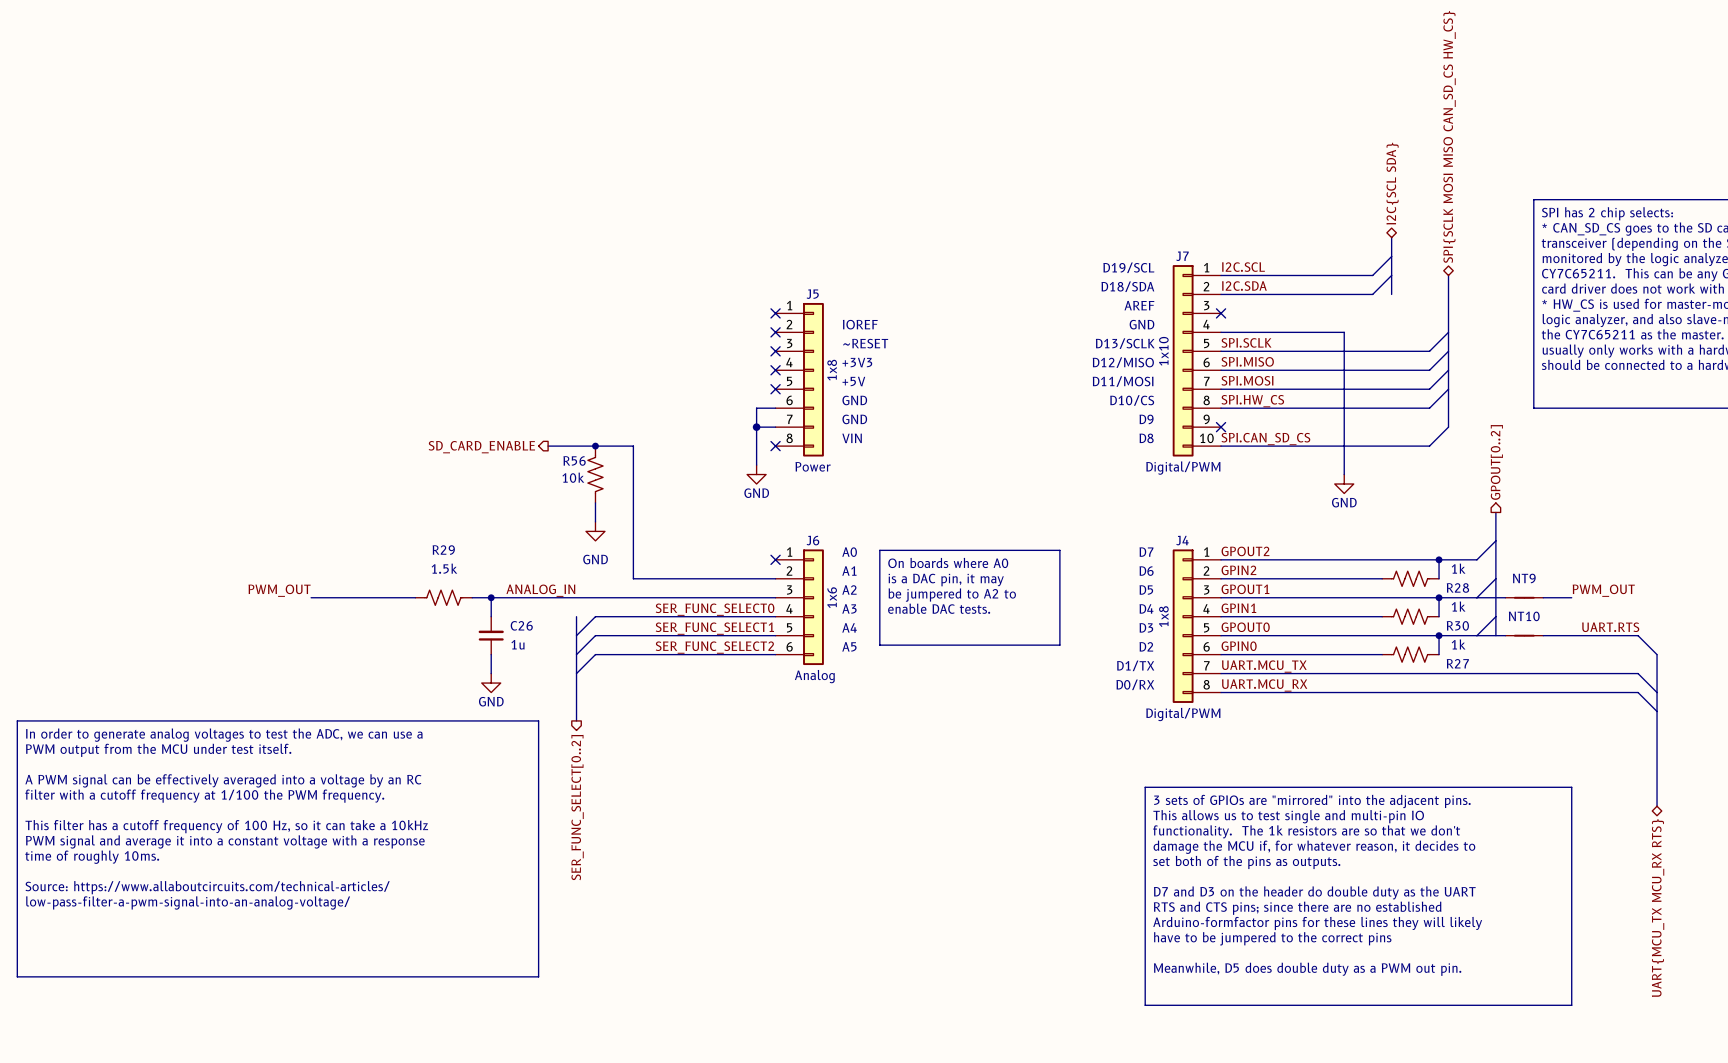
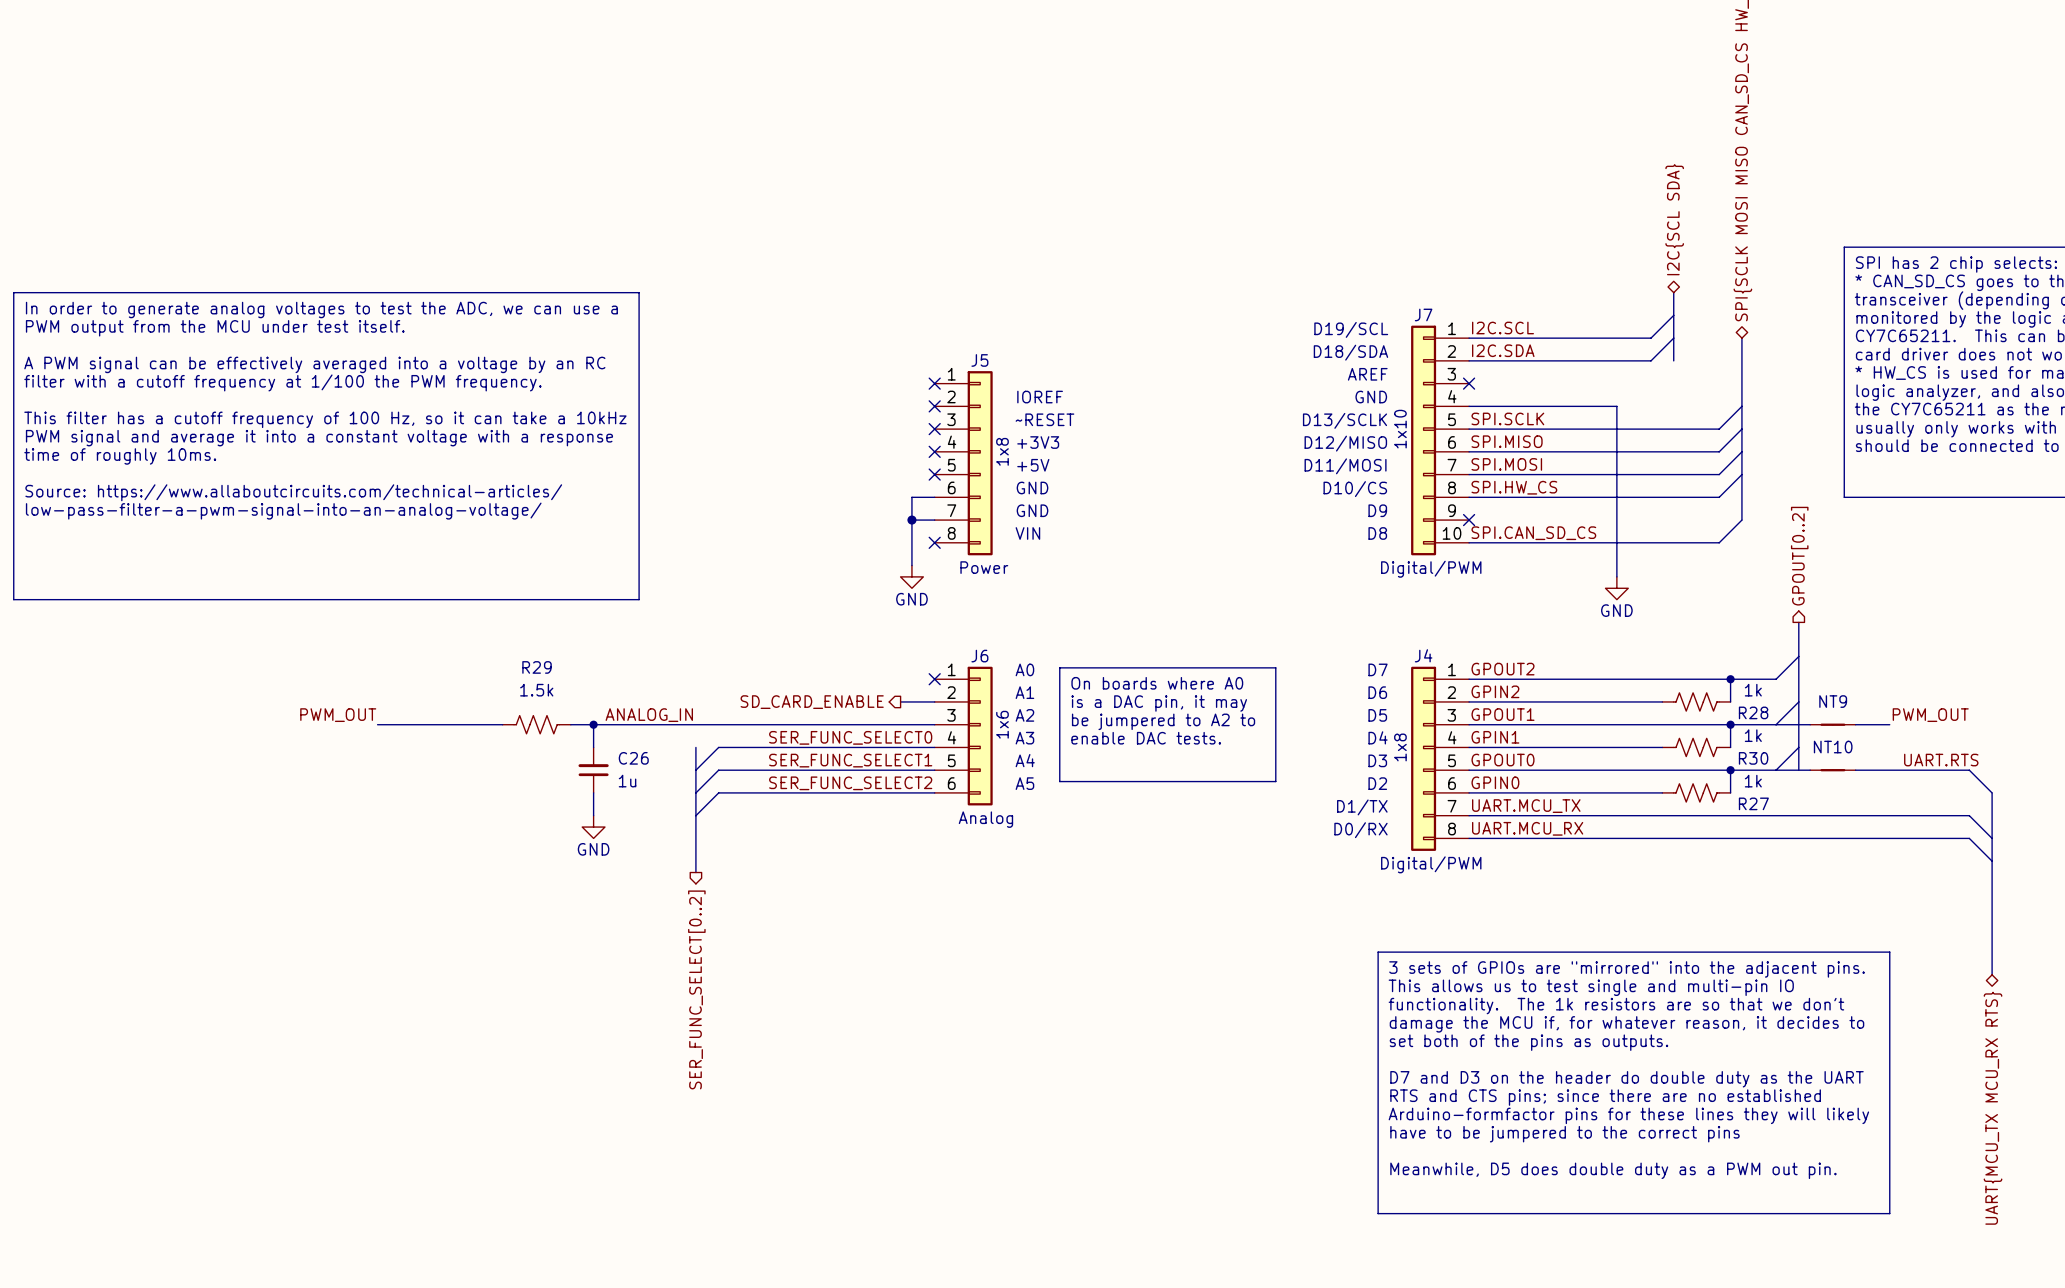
line: none -> (13, 292) (639, 292) (639, 599) (13, 599) (13, 292)
text: none -> In order to generate analog voltages to test the ADC, we can use a (321, 309)
text: none -> PWM output from the MCU under test itself. (215, 328)
text: none -> A PWM signal can be effectively averaged into a voltage by an RC (314, 364)
text: none -> filter with a cutoff frequency at 1/100 the PWM frequency. (282, 382)
text: none -> This filter has a cutoff frequency of 100 Hz, so it can take a 10kHz (325, 419)
text: none -> PWM signal and average it into a constant voltage with a response (319, 438)
text: none -> time of roughly 10ms. (120, 456)
text: none -> Source: https://www.allaboutcircuits.com/technical-articles/ (293, 492)
text: none -> low-pass-filter-a-pwm-signal-into-an-analog-voltage/ (283, 511)
wire: (548, 446) (633, 446) (633, 578) (747, 578) -> none
junction: (595, 446) -> none
hierarchical label: SD_CARD_ENABLE (481, 447) -> none
R56: 10k (595, 474) -> none
wire: (595, 502) (595, 521) -> none
power symbol: GND (595, 531) -> none
hierarchical label: none -> SD_CARD_ENABLE (812, 702)
line: (17, 720) (538, 720) (538, 976) (17, 976) (17, 720) -> none
text: In order to generate analog voltages to test the ADC, we can use a (224, 735) -> none
text: PWM output from the MCU under test itself. (158, 750) -> none
text: A PWM signal can be effectively averaged into a voltage by an RC (223, 780) -> none
text: filter with a cutoff frequency at 1/100 the PWM frequency. (204, 796) -> none
text: This filter has a cutoff frequency of 100 Hz, so it can take a 10kHz (226, 826) -> none
text: PWM signal and average it into a constant voltage with a response (225, 841) -> none
text: time of roughly 10ms. (92, 857) -> none
text: Source: https://www.allaboutcircuits.com/technical-articles/ (207, 887) -> none
text: low-pass-filter-a-pwm-signal-into-an-analog-voltage/ (188, 902) -> none

